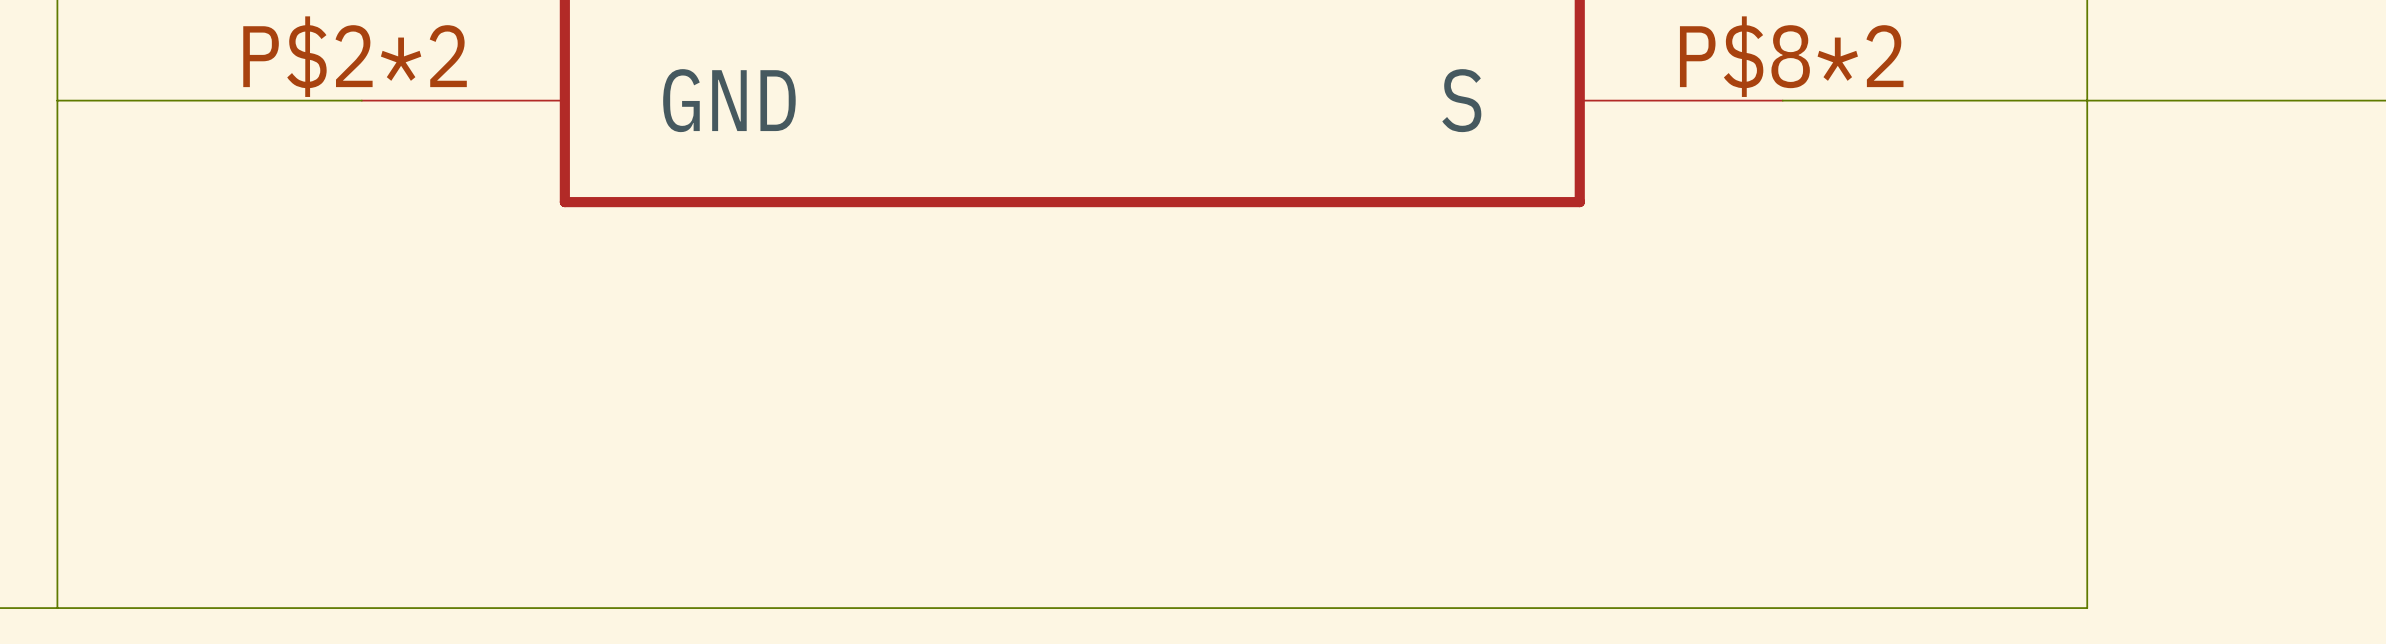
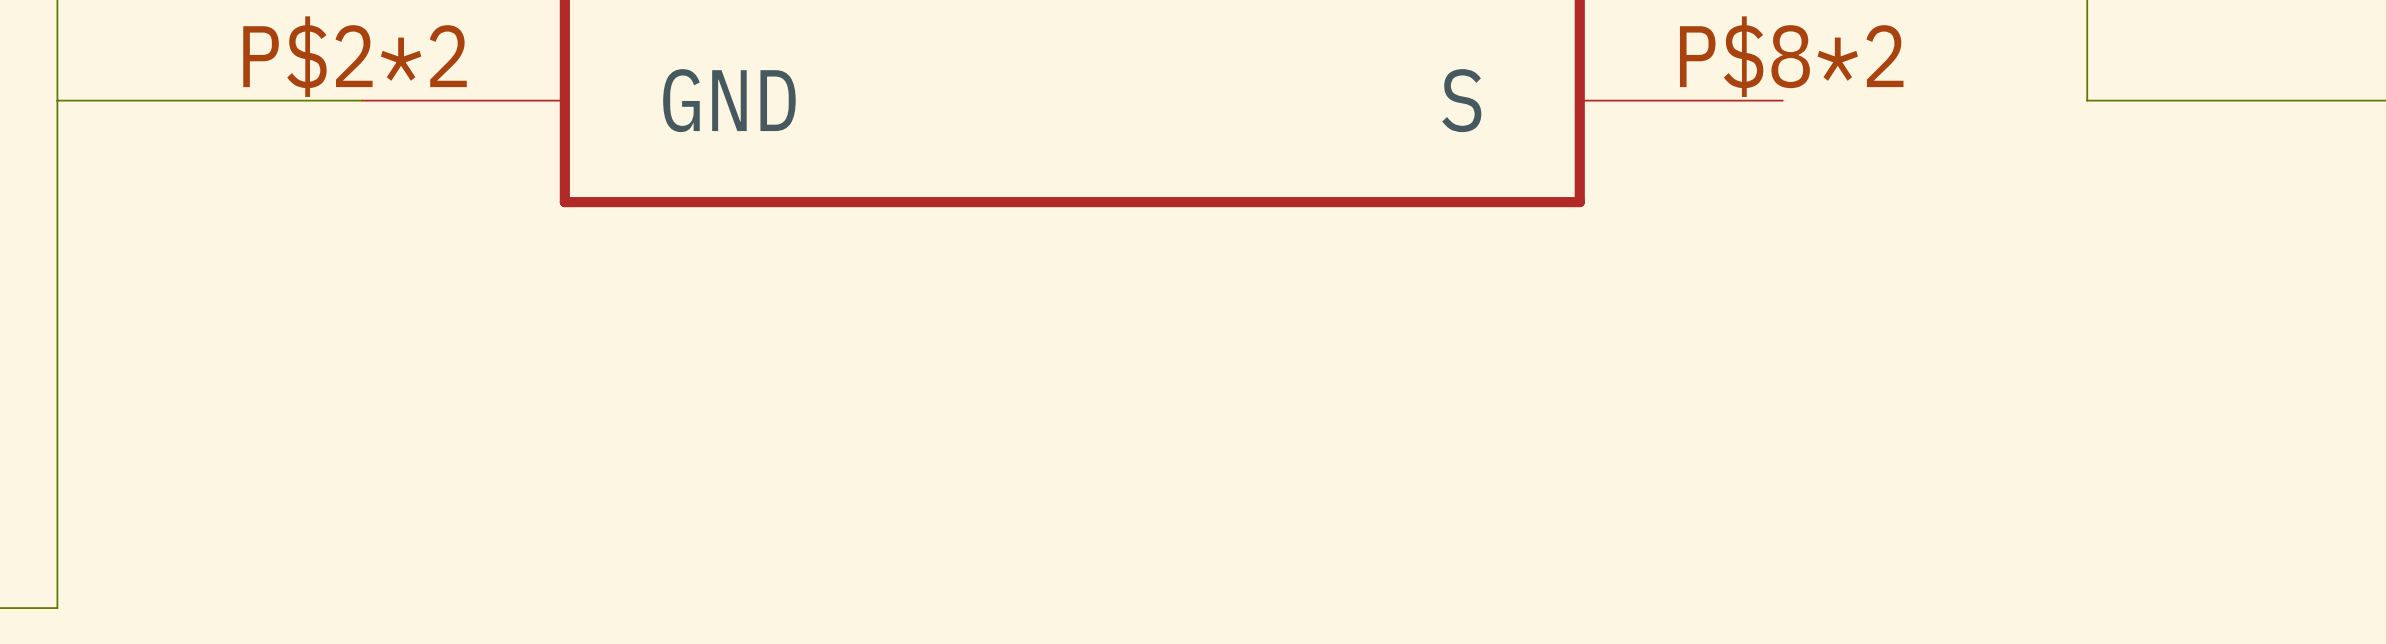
wire: (1782, 100) (2087, 100) (2087, 608) (57, 608) -> none

